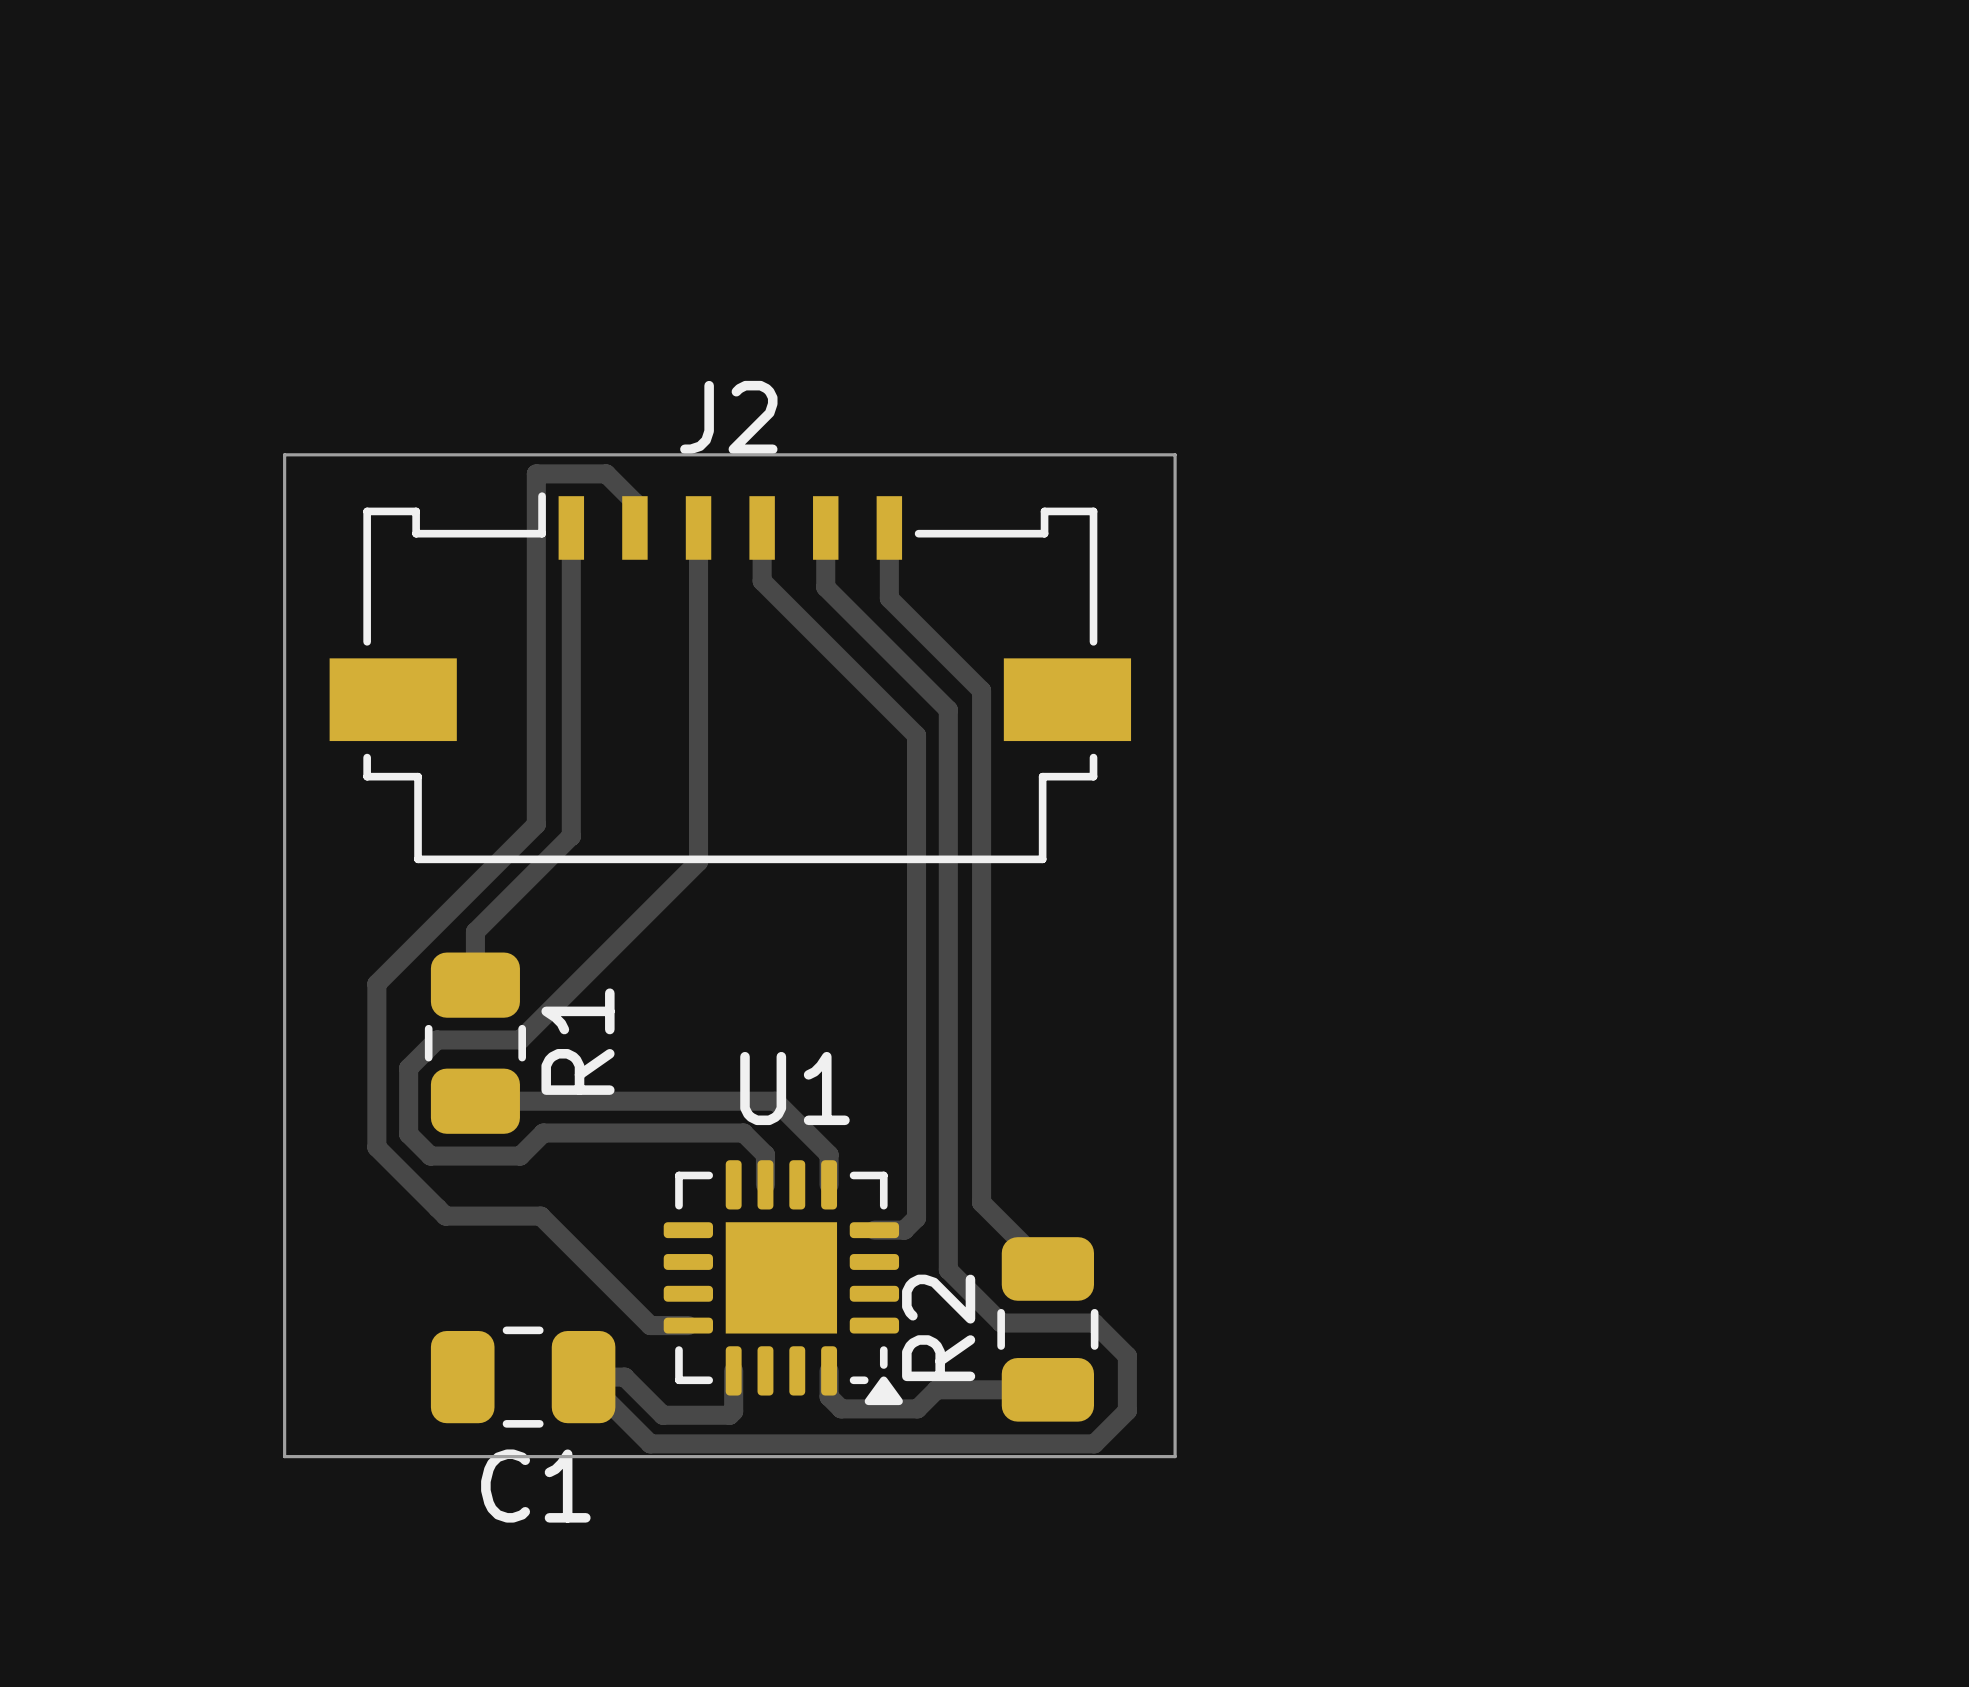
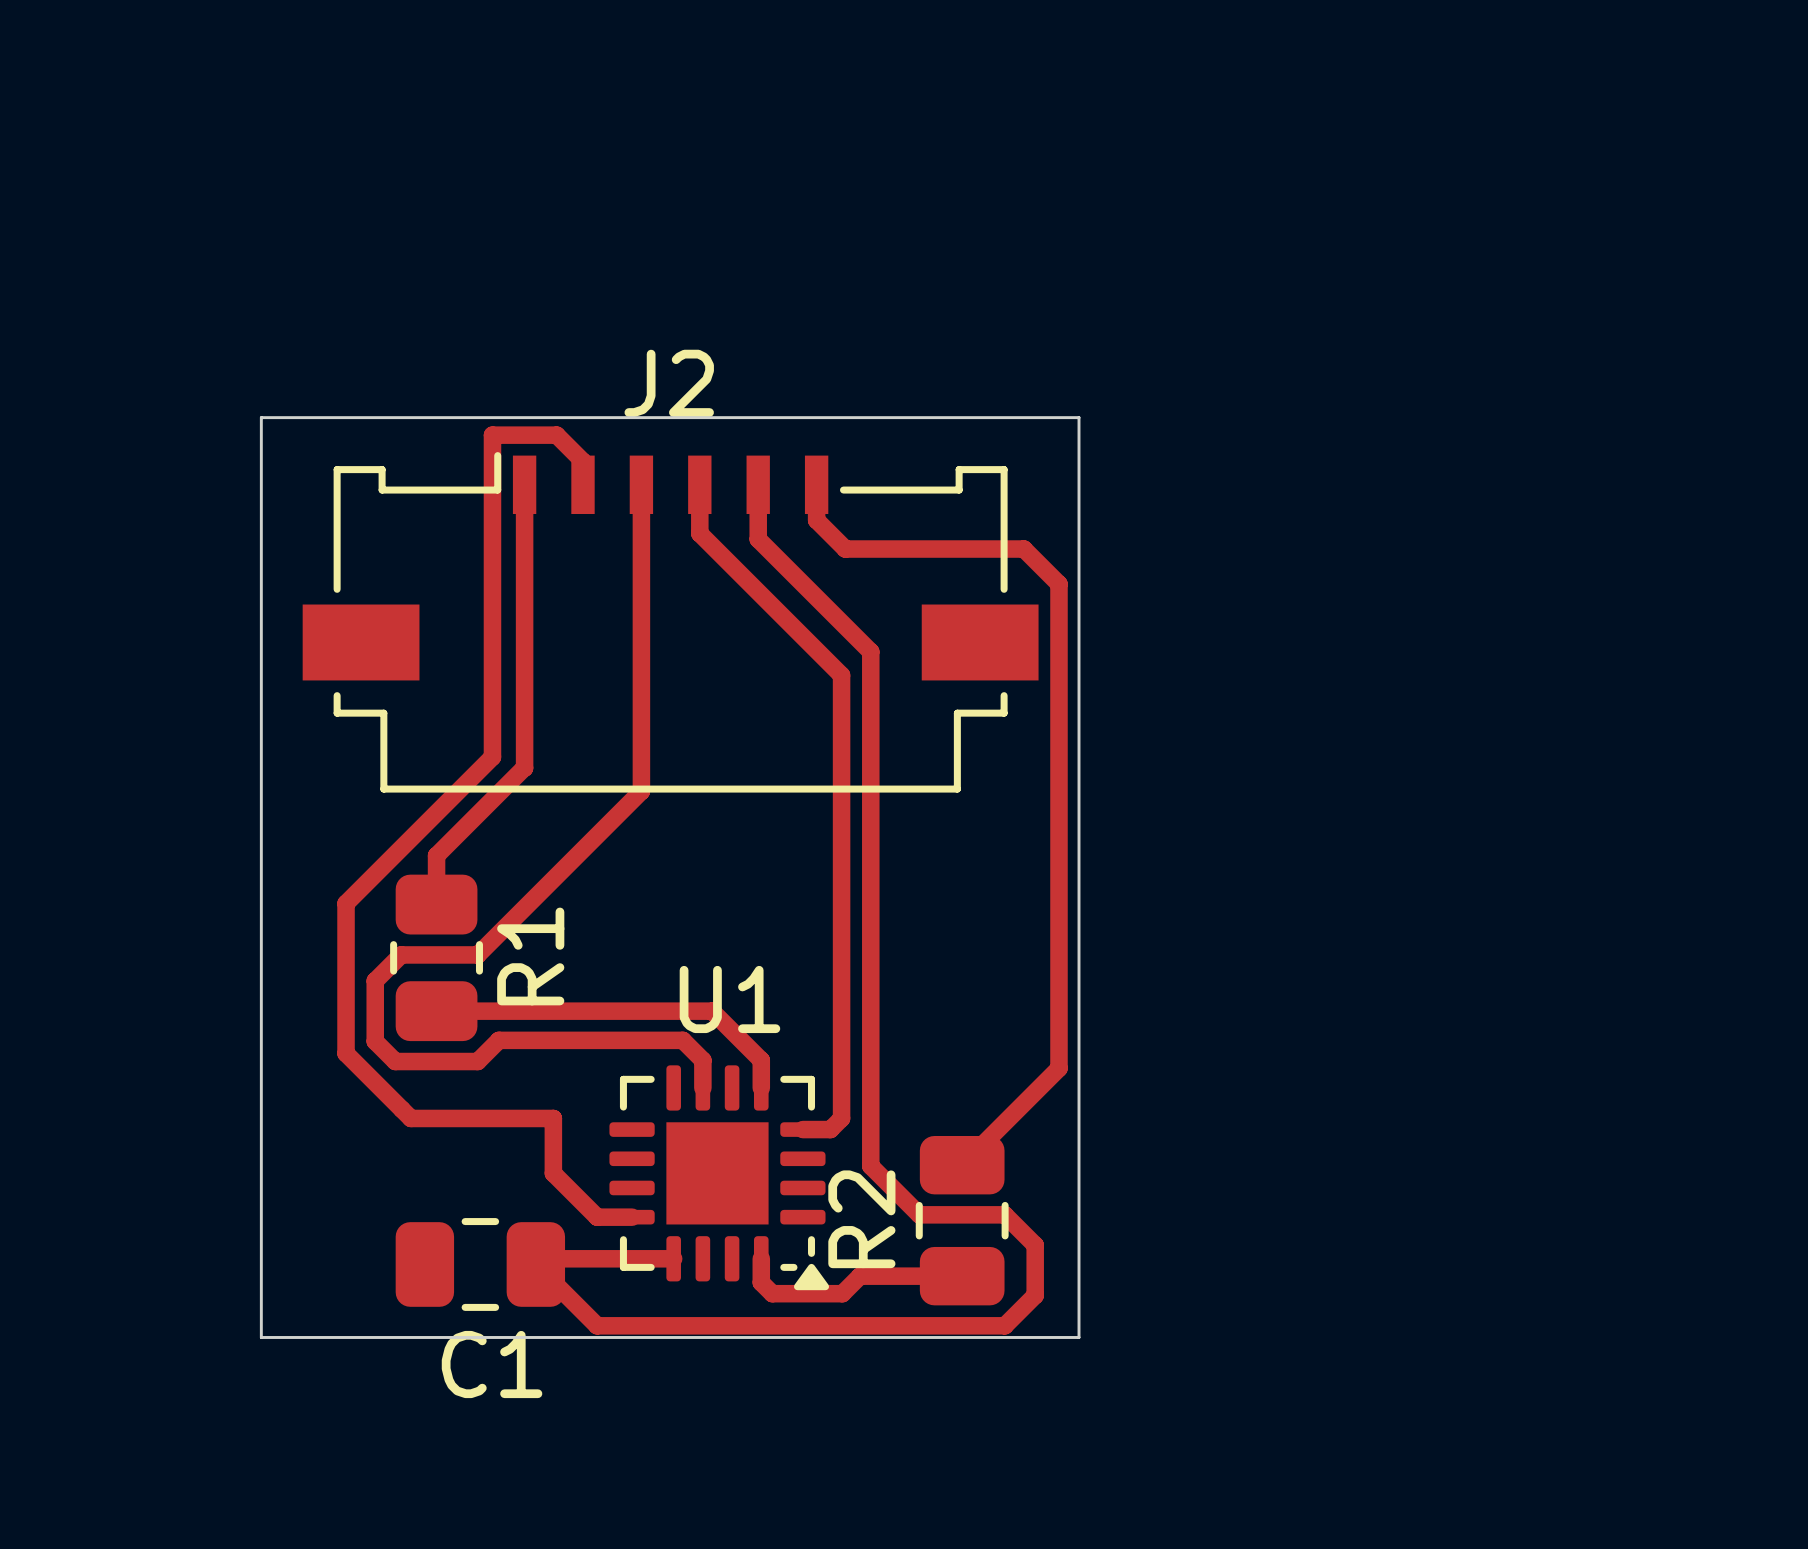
track: (889, 566) (889, 598) (981, 690) (981, 1202) (1047, 1268) -> (816, 520) (845, 549) (1023, 549) (1058, 584) (1058, 1068) (962, 1165)
track: (445, 1216) (540, 1216) (602, 1277) -> (409, 1116) (411, 1118) (553, 1118) (553, 1173)
track: (733, 1370) (733, 1411) (729, 1415) (662, 1415) (624, 1377) (583, 1377) -> (673, 1258) (541, 1258) (535, 1264)

